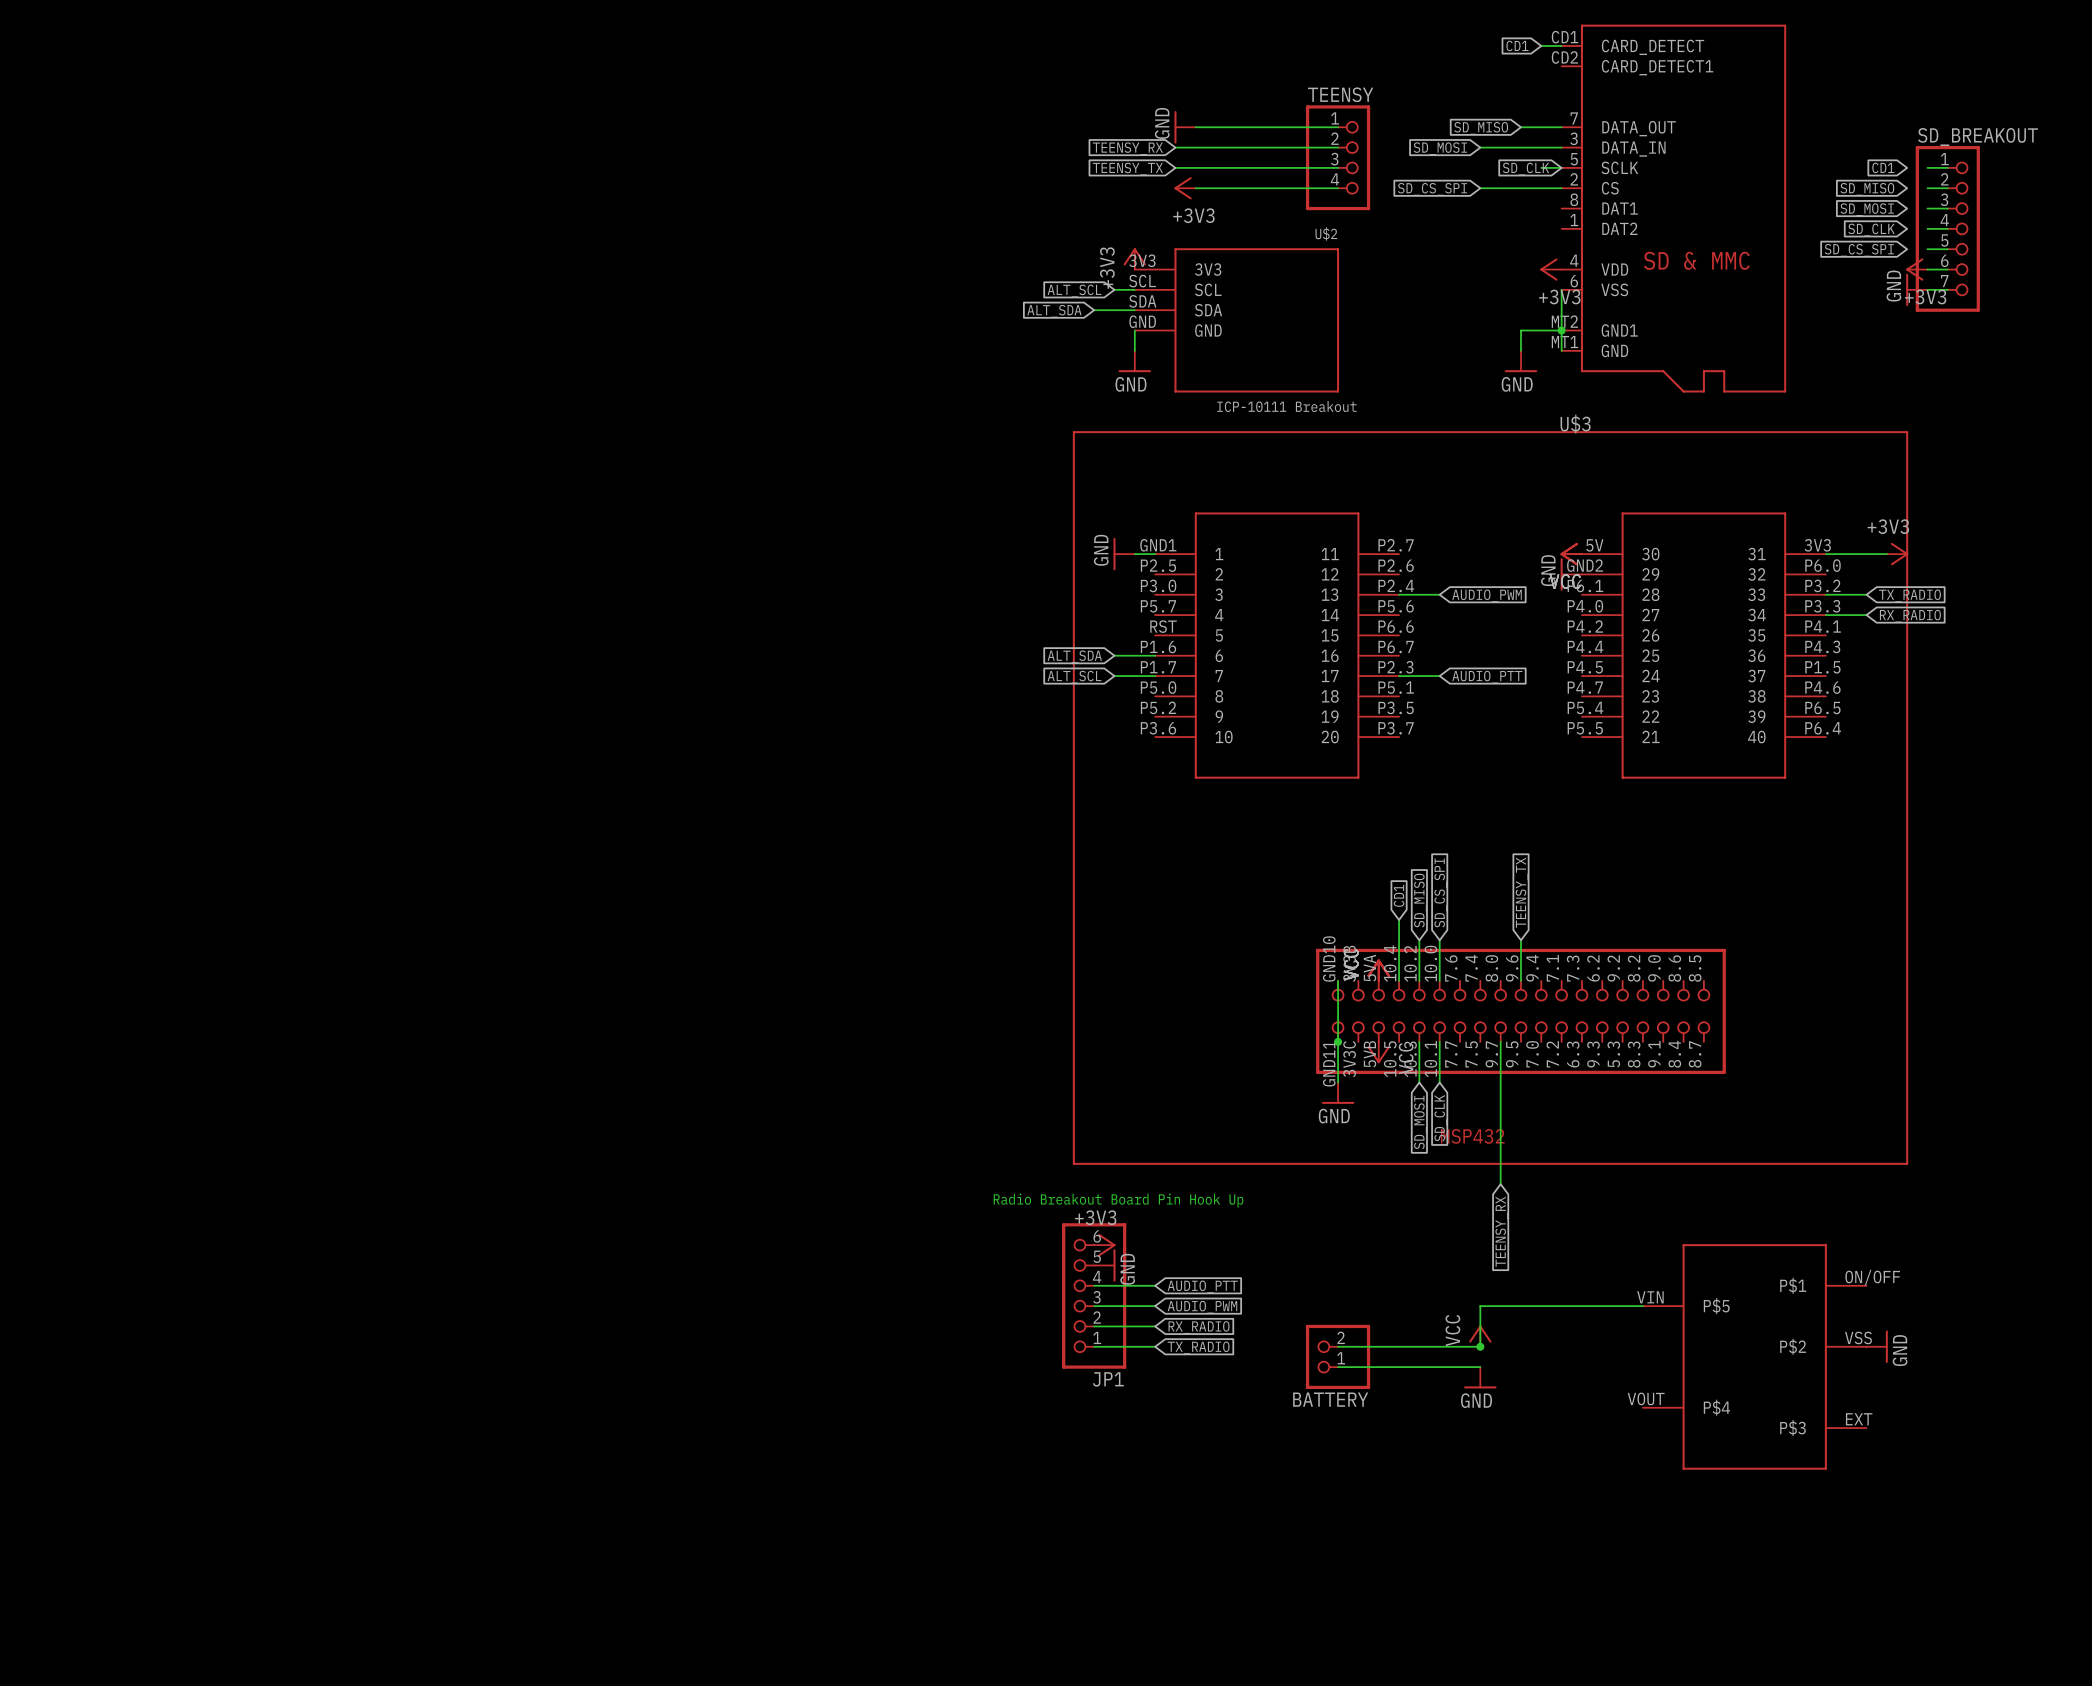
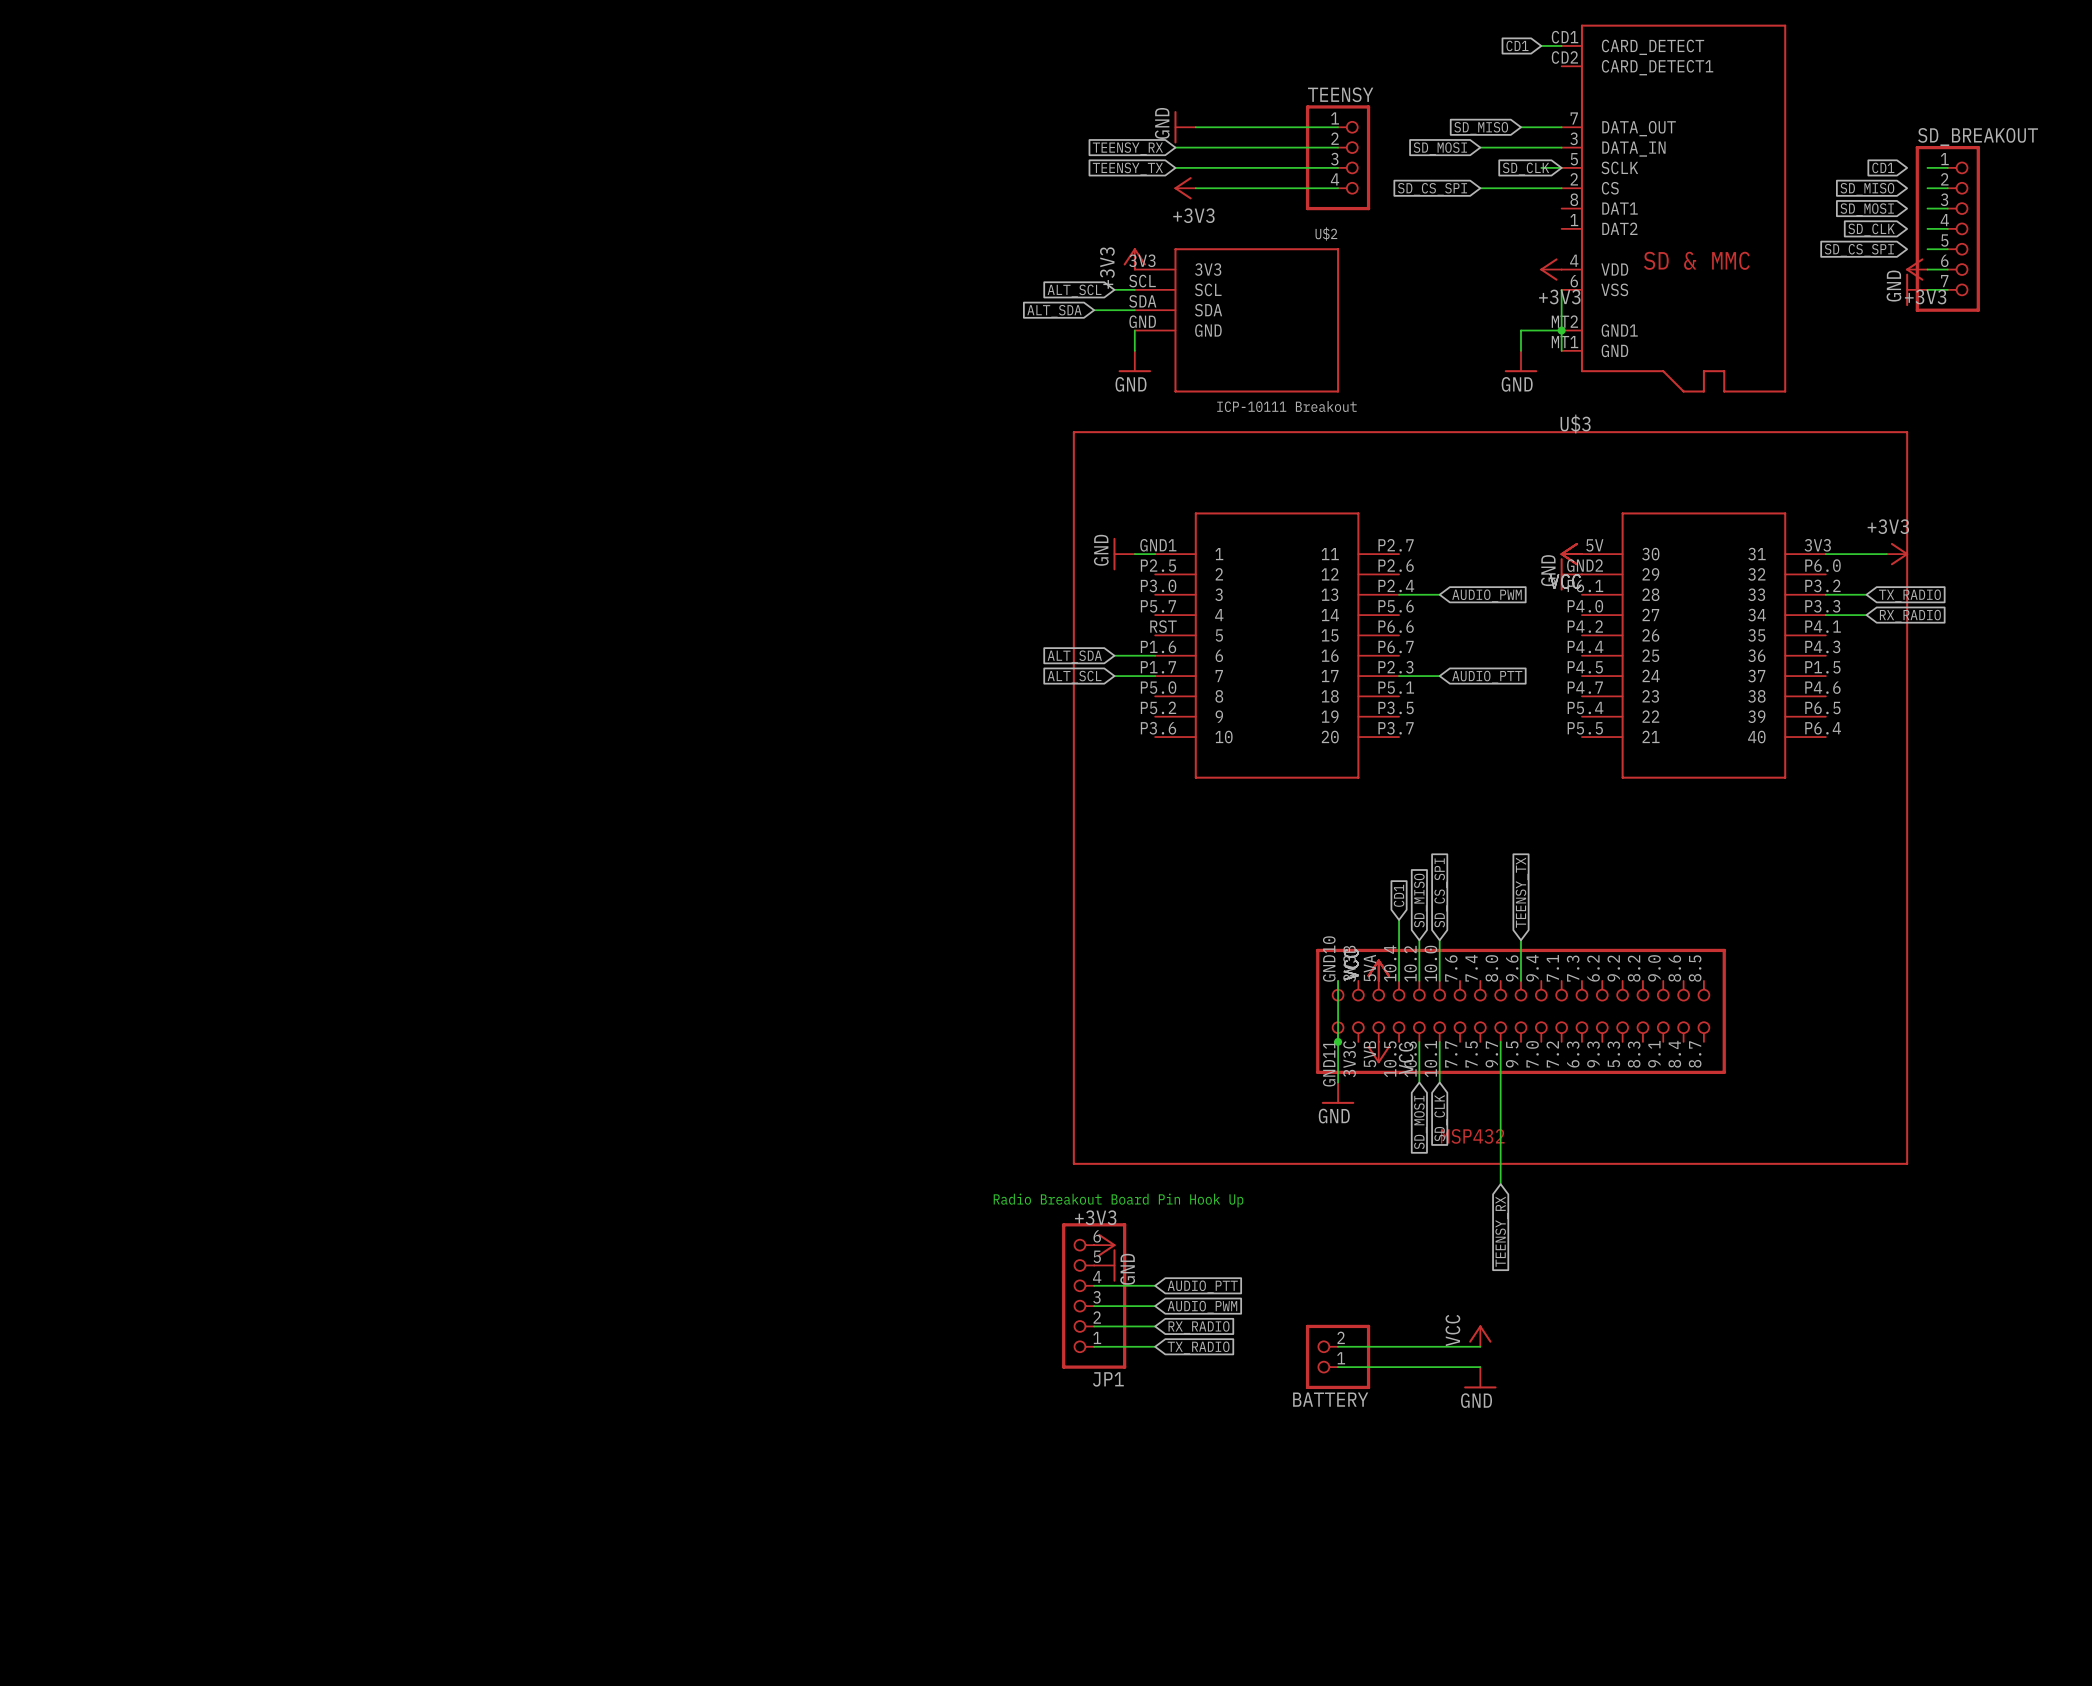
wire: (1642, 1306) (1480, 1306) (1480, 1346) -> none
junction: (1480, 1346) -> none
power symbol: GND (1877, 1346) -> none
part: (1754, 1356) -> none

